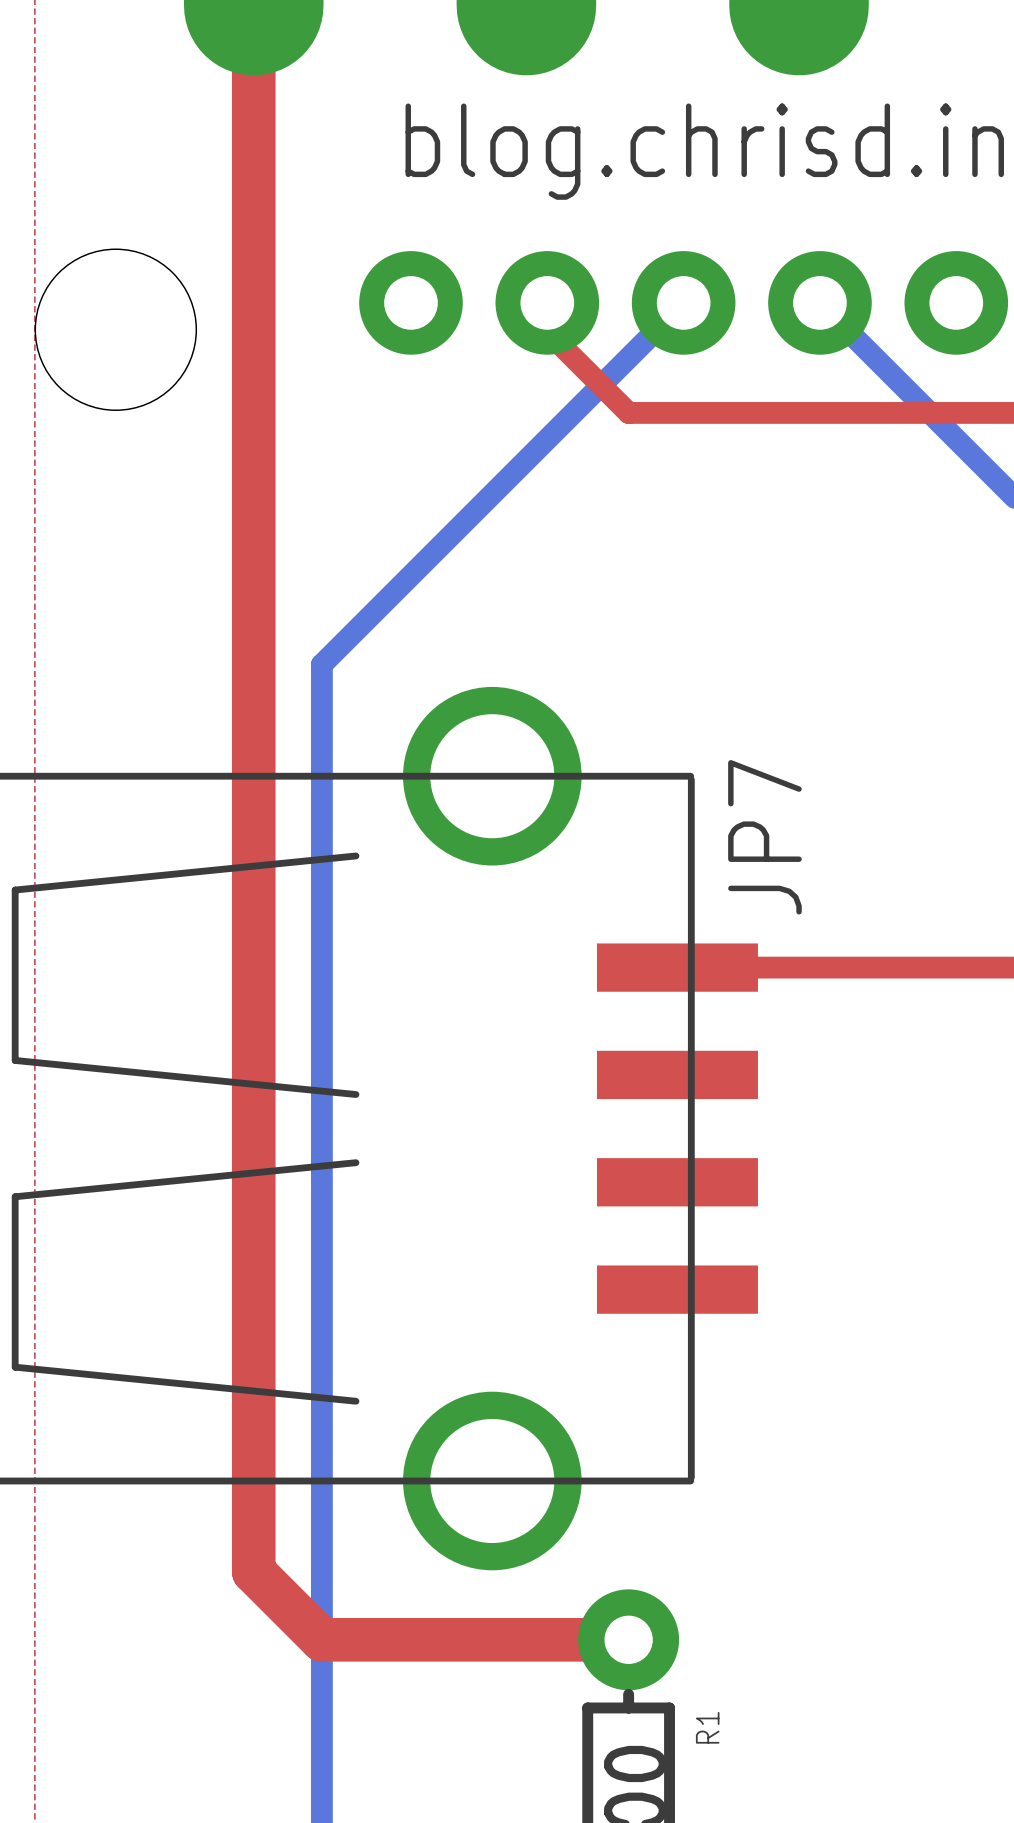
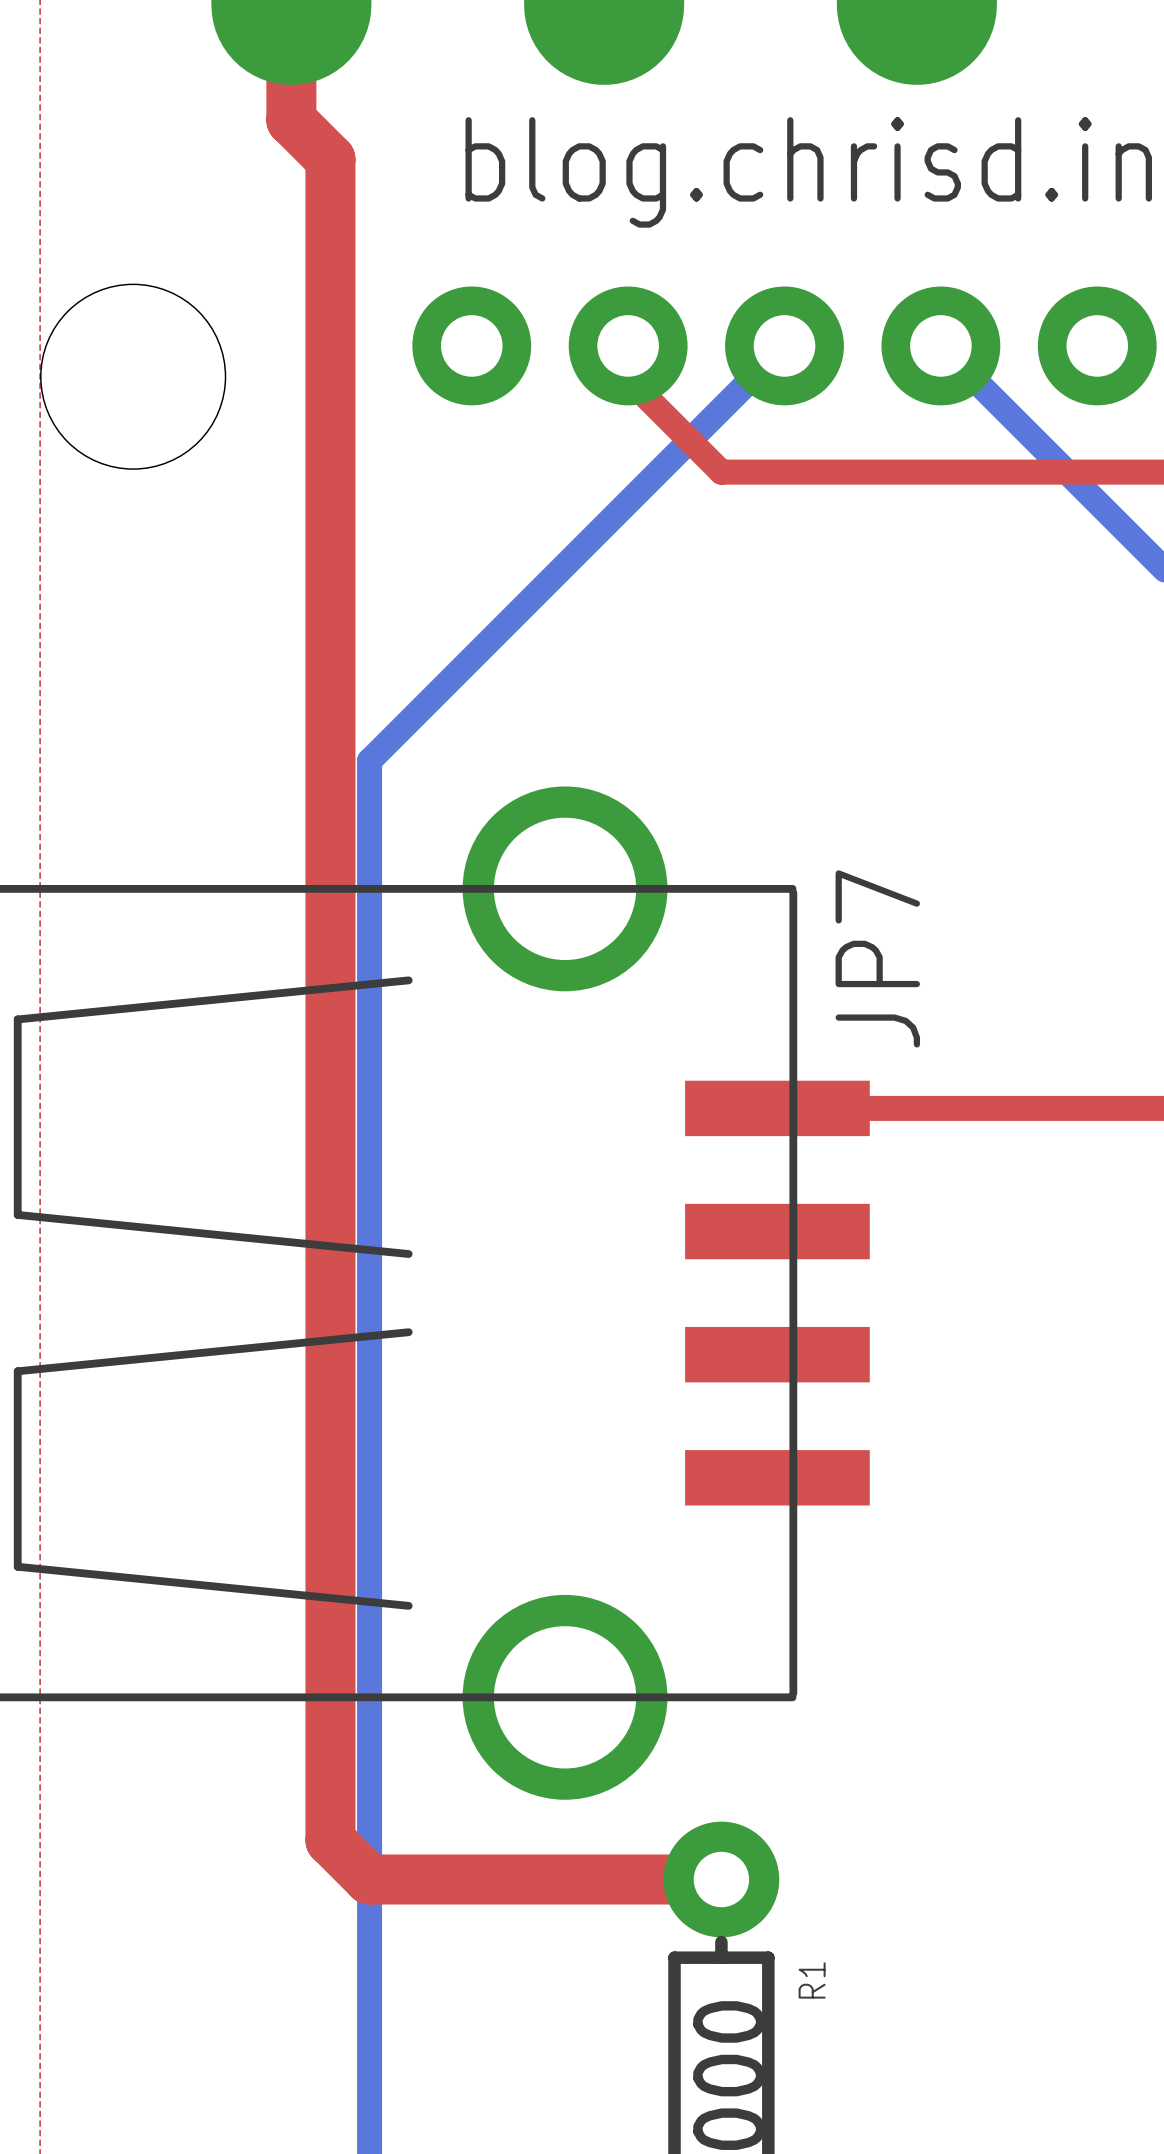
top track: (253, 106) (253, 1571) (287, 1605) -> (291, 120) (330, 159) (330, 1840)

